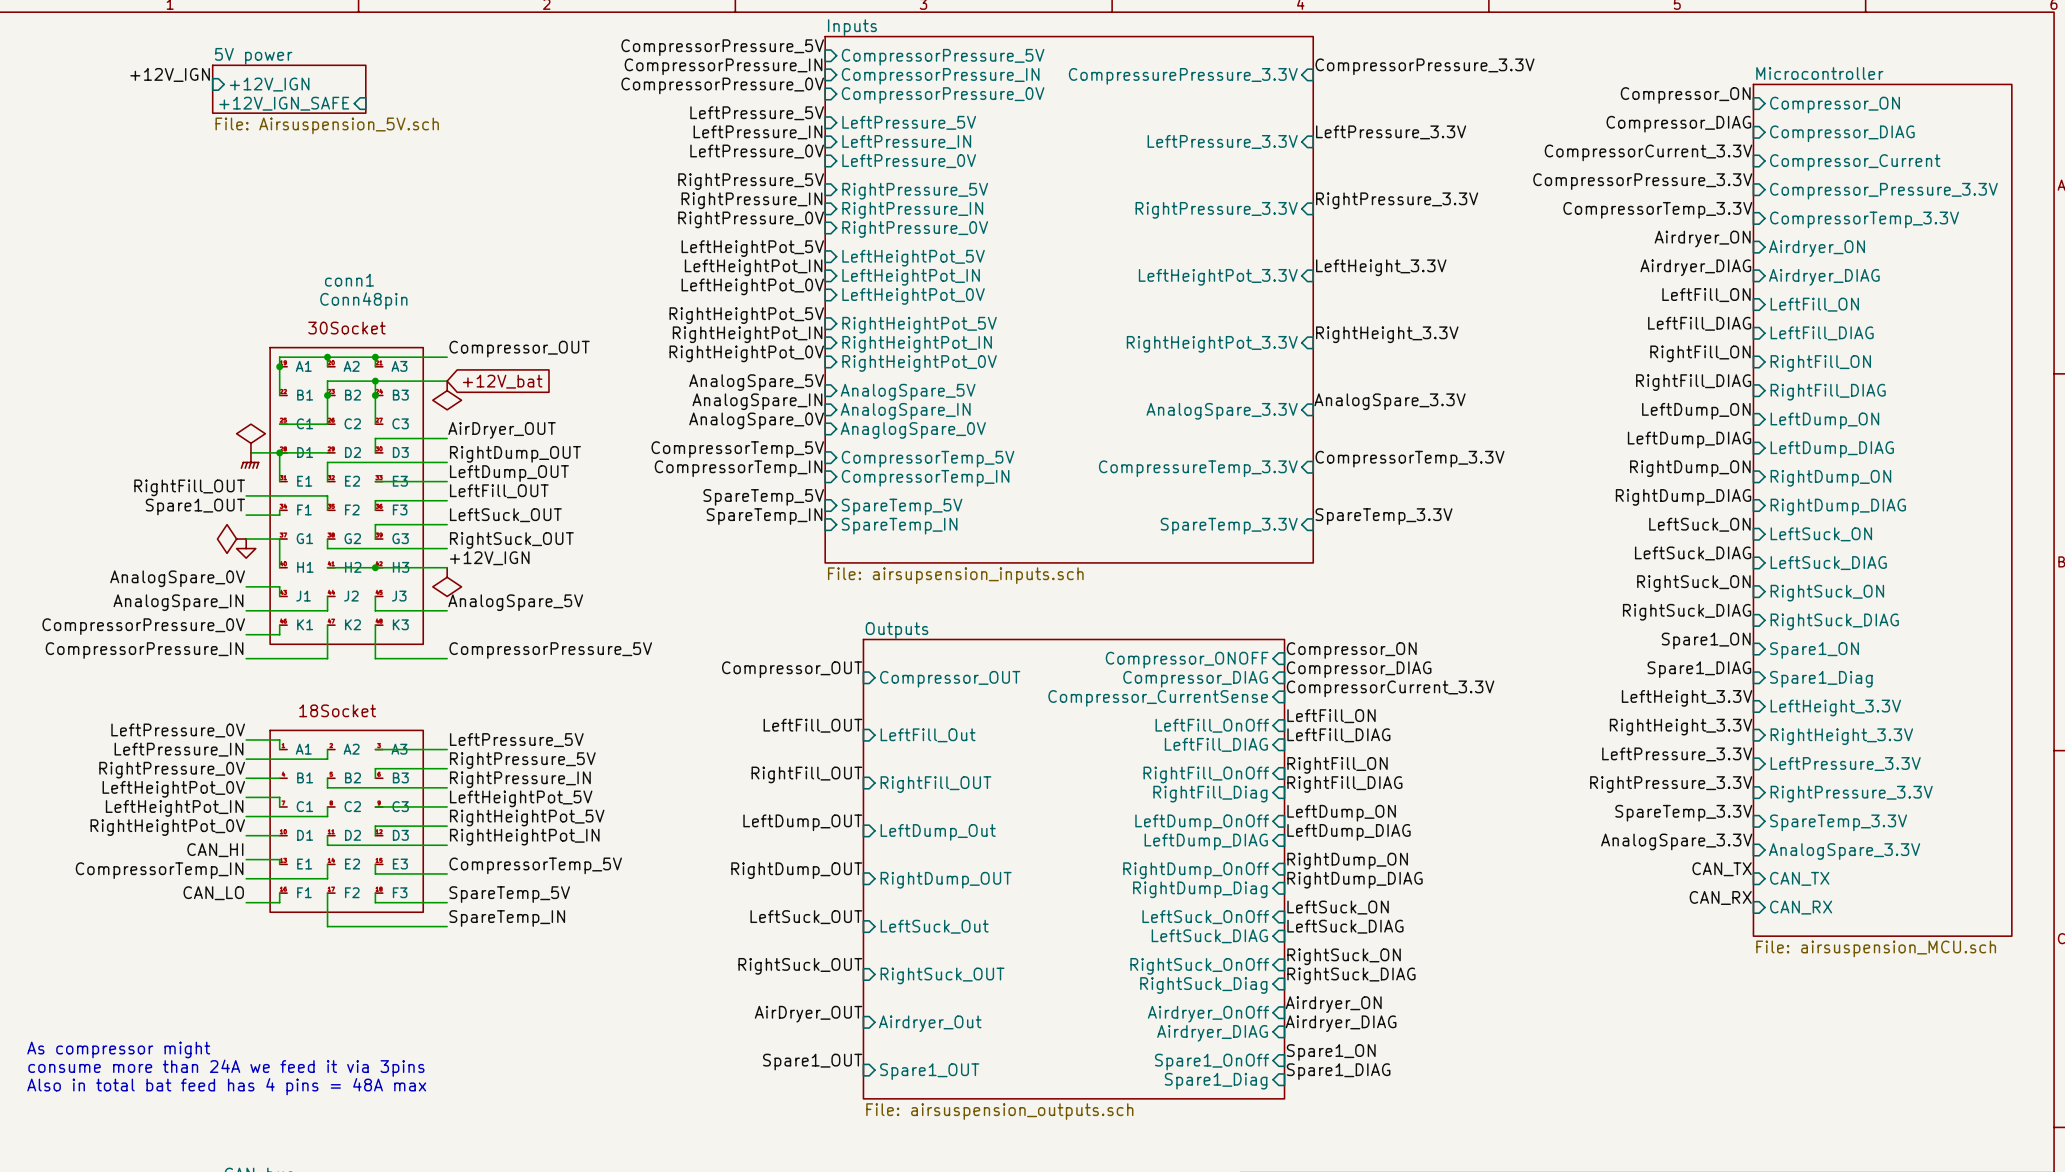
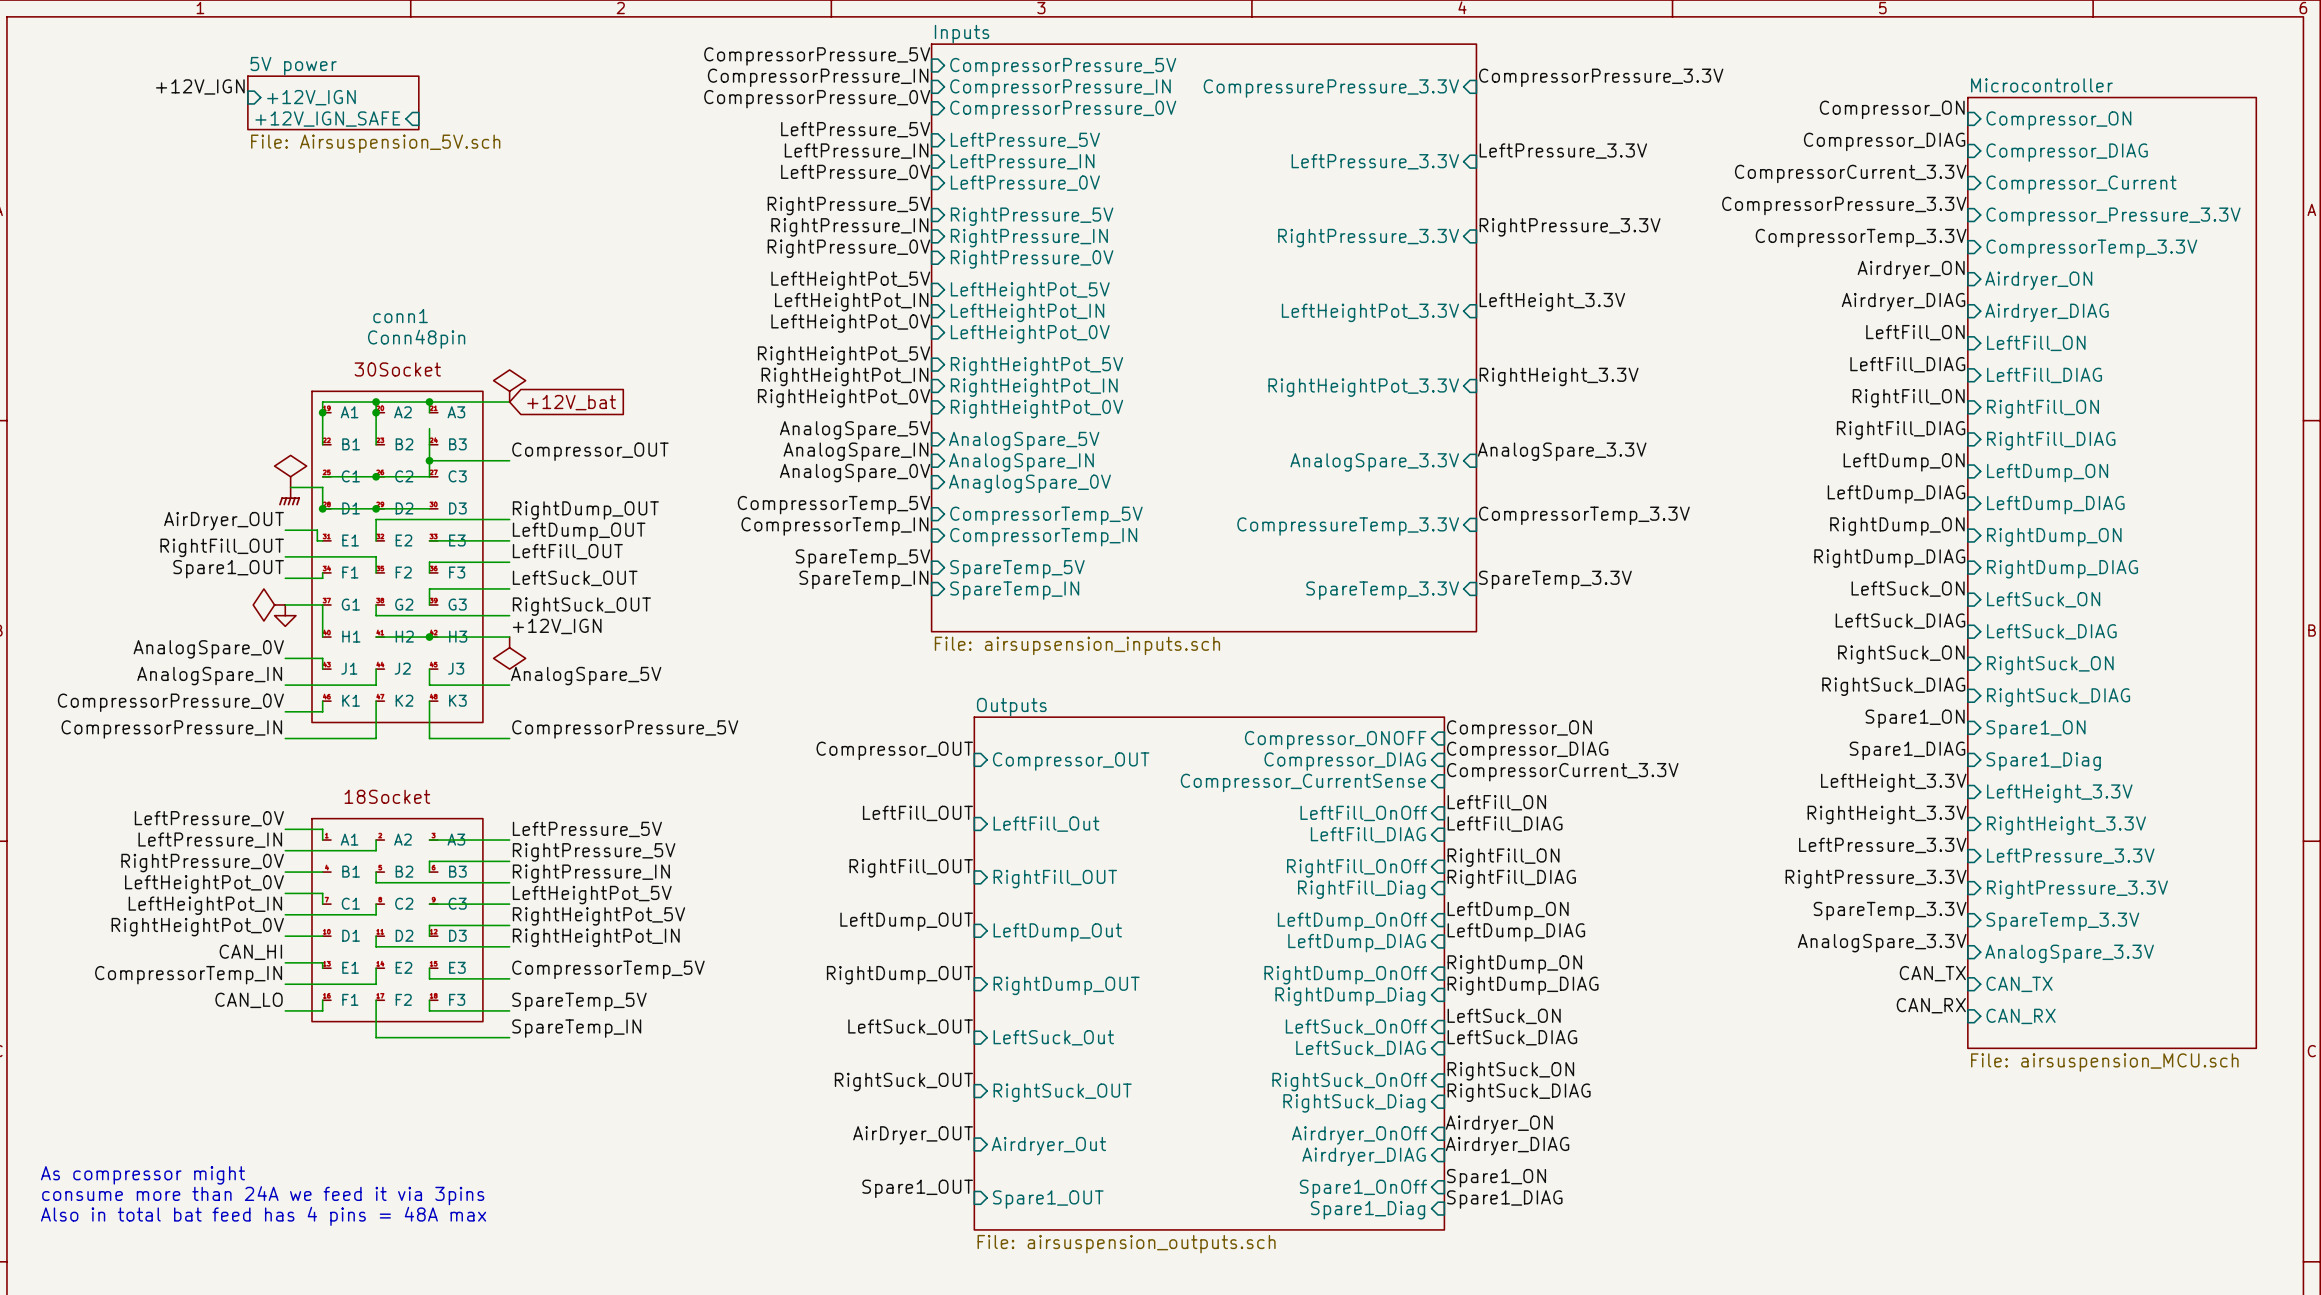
label position: Compressor_OUT (519, 349) -> Compressor_OUT (590, 451)
junction: none -> (376, 412)
wire: (327, 381) (447, 381) -> (376, 428) (376, 412)
junction: (375, 381) -> none
global label position: +12V_bat (502, 381) -> +12V_bat (571, 402)
wire: (327, 395) (327, 424) -> (429, 476) (376, 476)
junction: (327, 395) -> none
junction: (375, 395) -> none
power symbol rotation: 0° (447, 395) -> 180° (509, 385)
power symbol position: (447, 395) -> (509, 385)
wire: none -> (429, 460) (509, 460)
junction: none -> (429, 460)
power symbol: none -> (290, 471)
power symbol shape: [236, 424, 266, 453] -> [279, 487, 301, 506]
junction: none -> (376, 476)
label: AirDryer_OUT (502, 430) -> none
wire: none -> (290, 487) (322, 487) (322, 508)
wire: (447, 438) (375, 438) (375, 452) -> (376, 508) (429, 508)
wire: (250, 452) (279, 452) (279, 481) -> (285, 530) (317, 530) (317, 540) (322, 540)
junction: none -> (376, 508)
power symbol: (250, 460) -> none
label: none -> AirDryer_OUT (224, 521)

